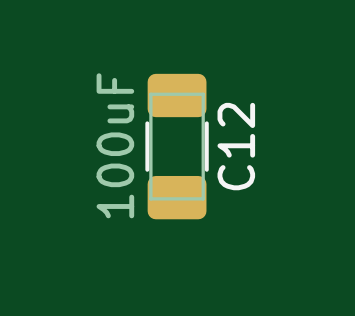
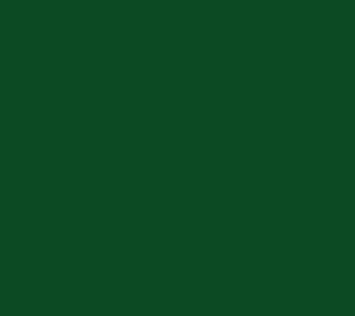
C12: 100uF (177, 146) -> none

